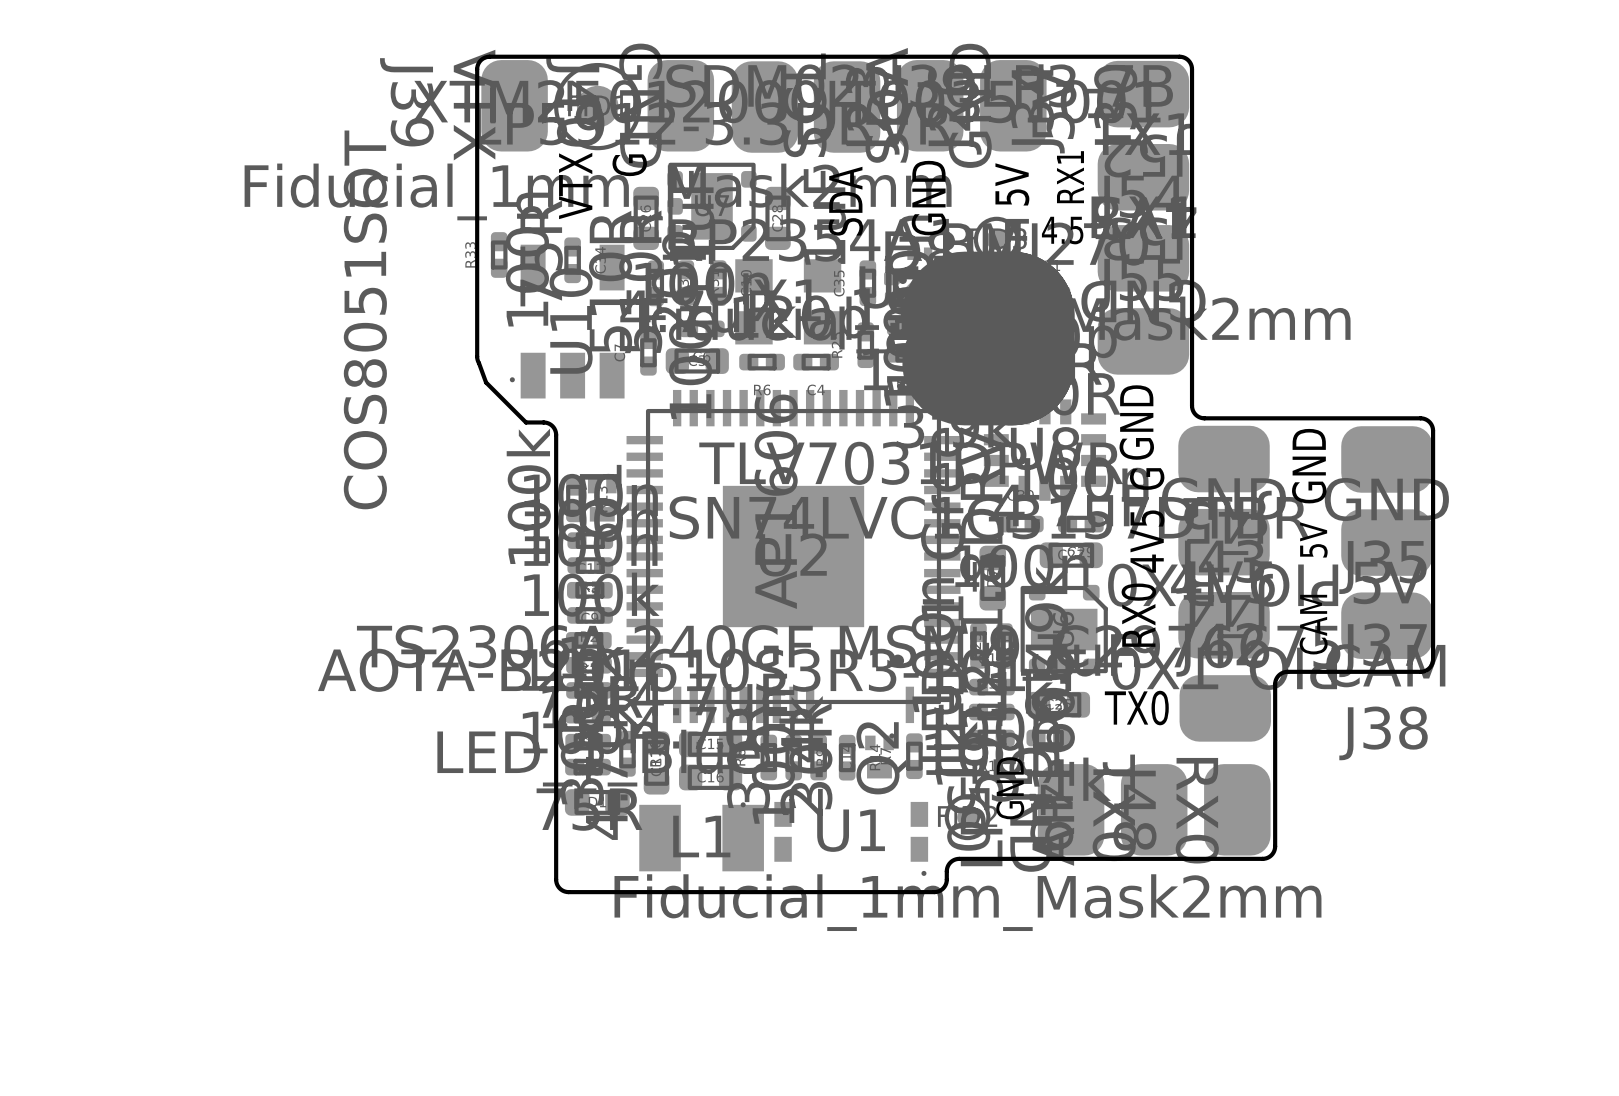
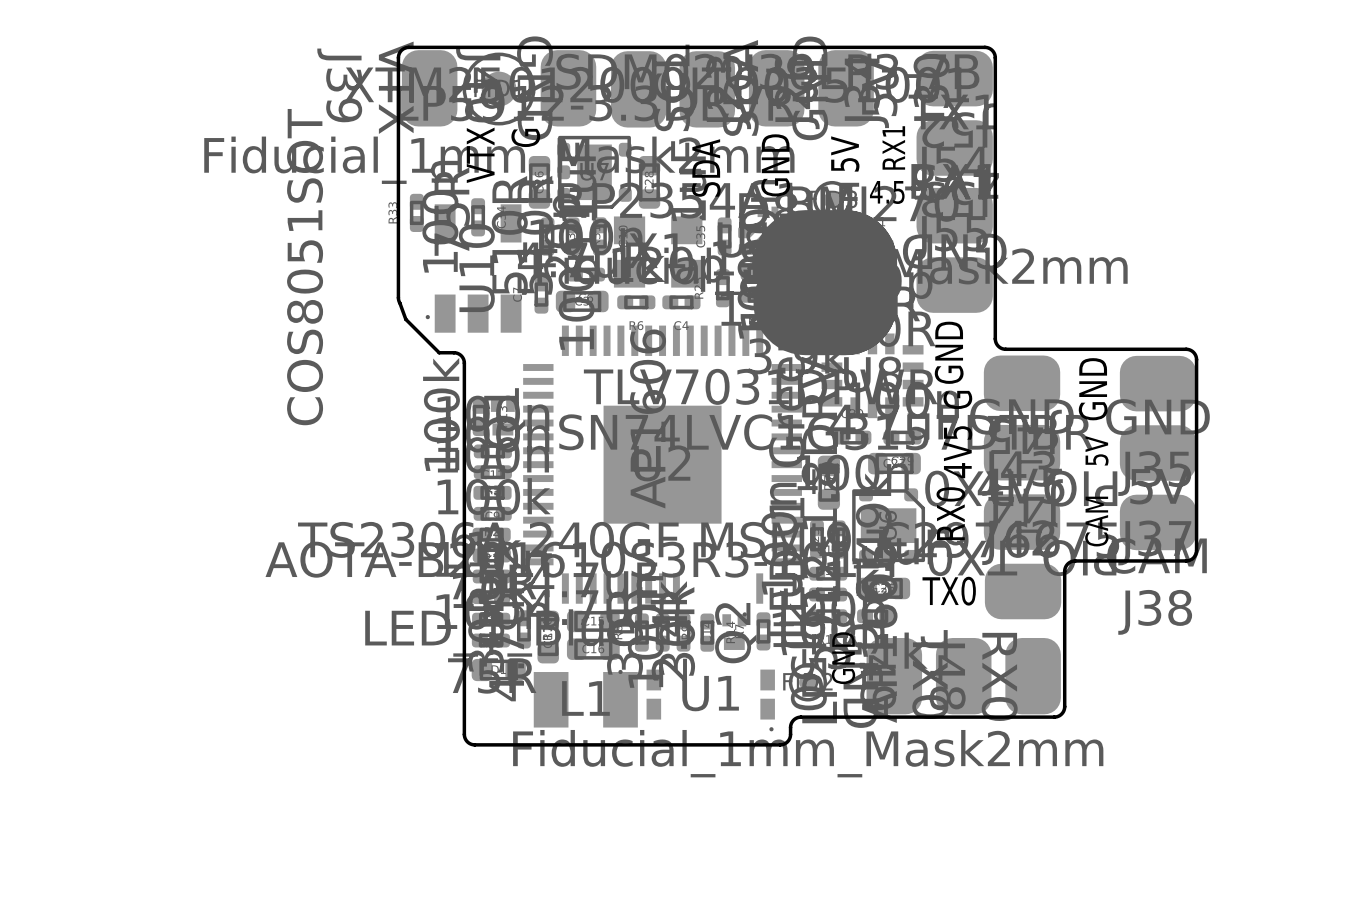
part footprint: [884, 269, 939, 308] -> [738, 227, 784, 255]
part footprint: [626, 389, 961, 724] -> [523, 325, 802, 604]

